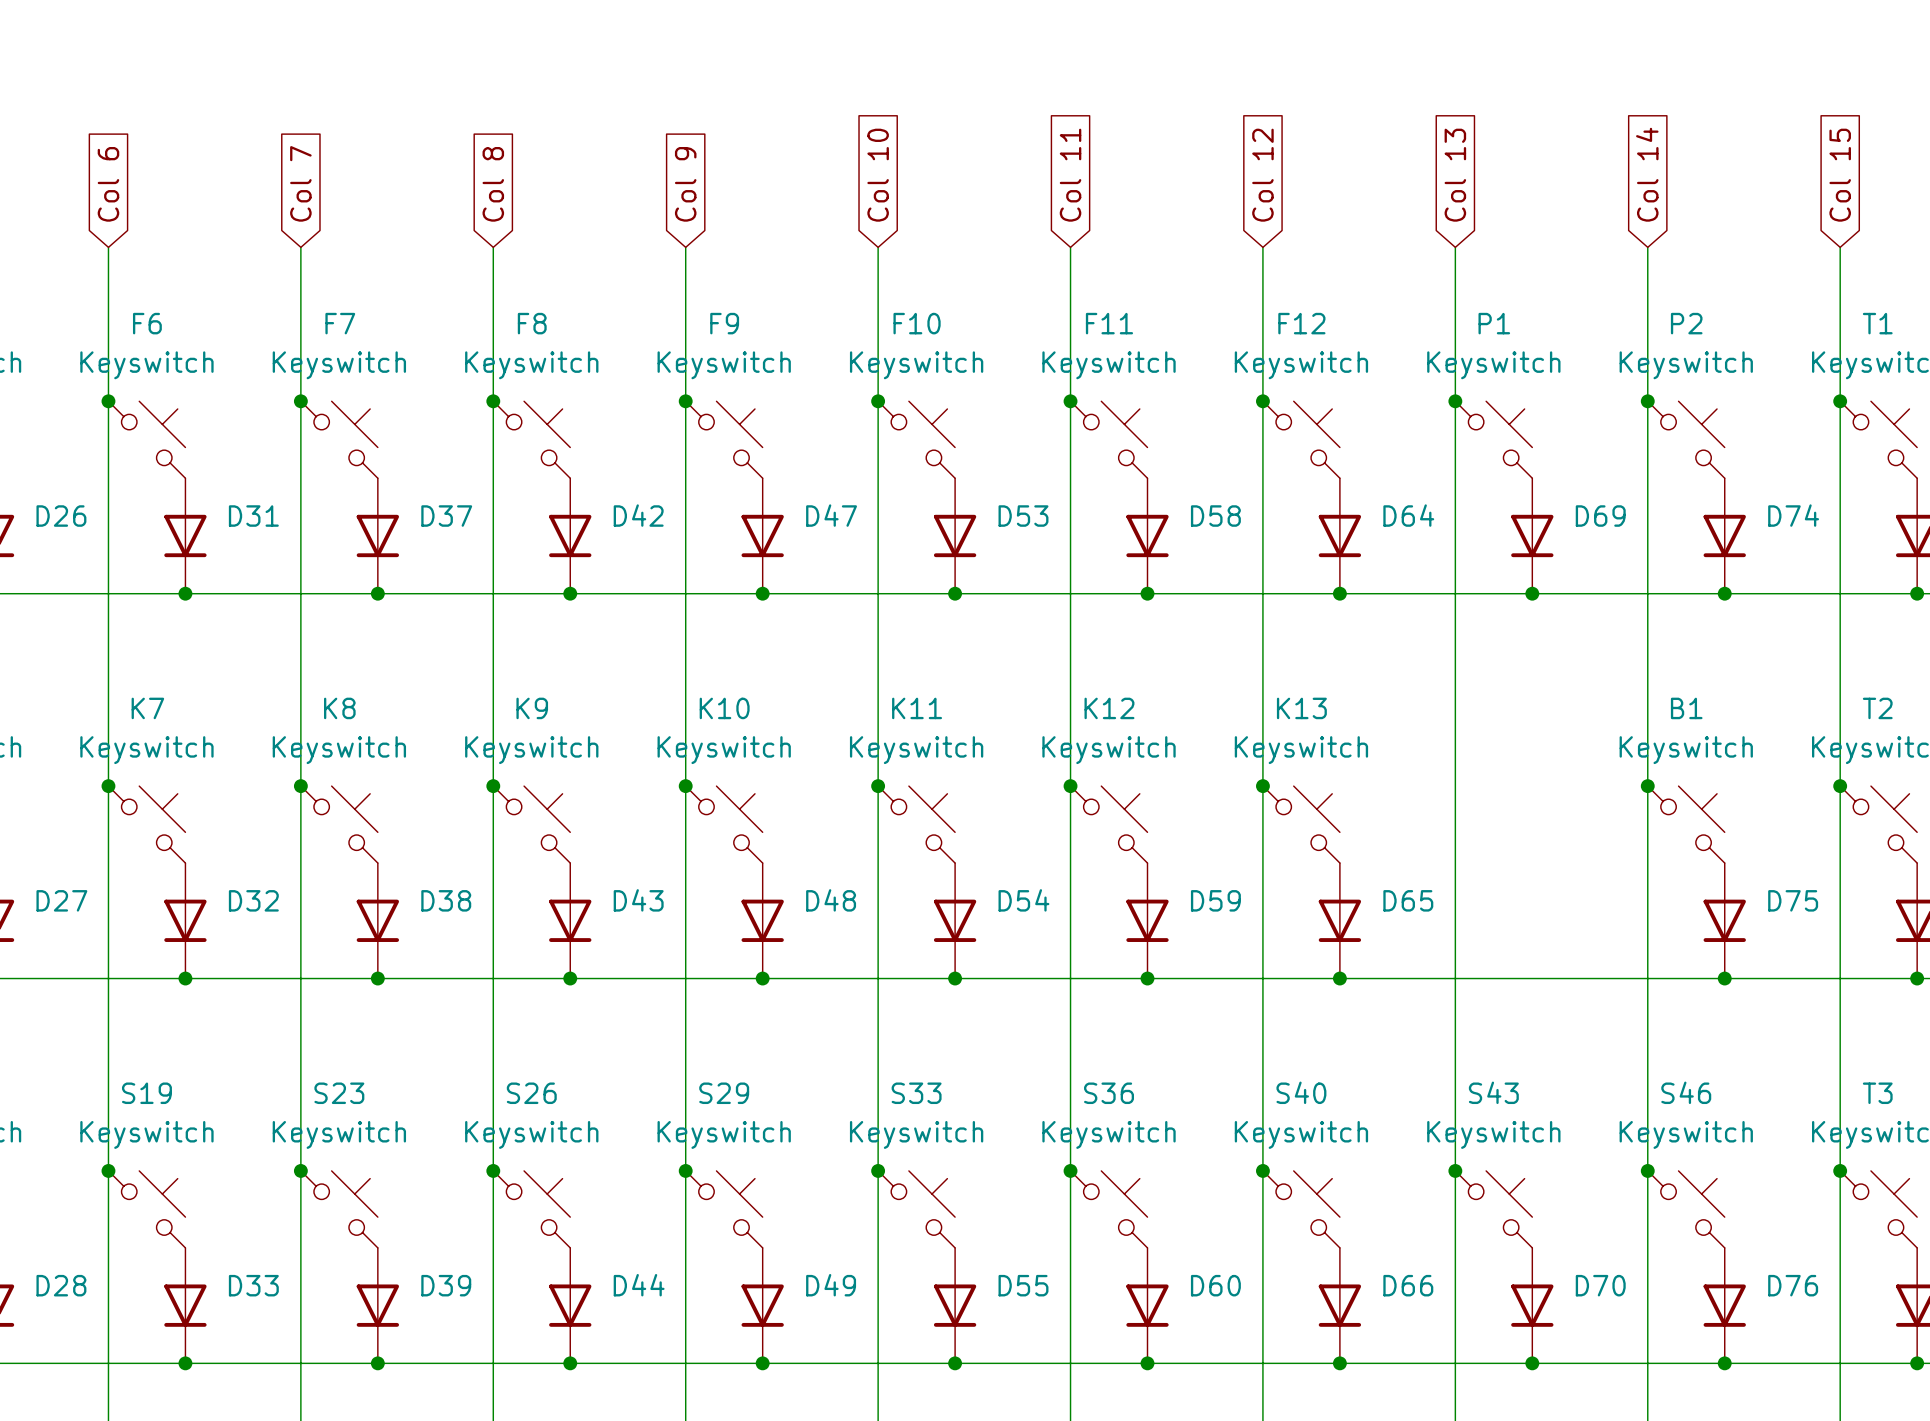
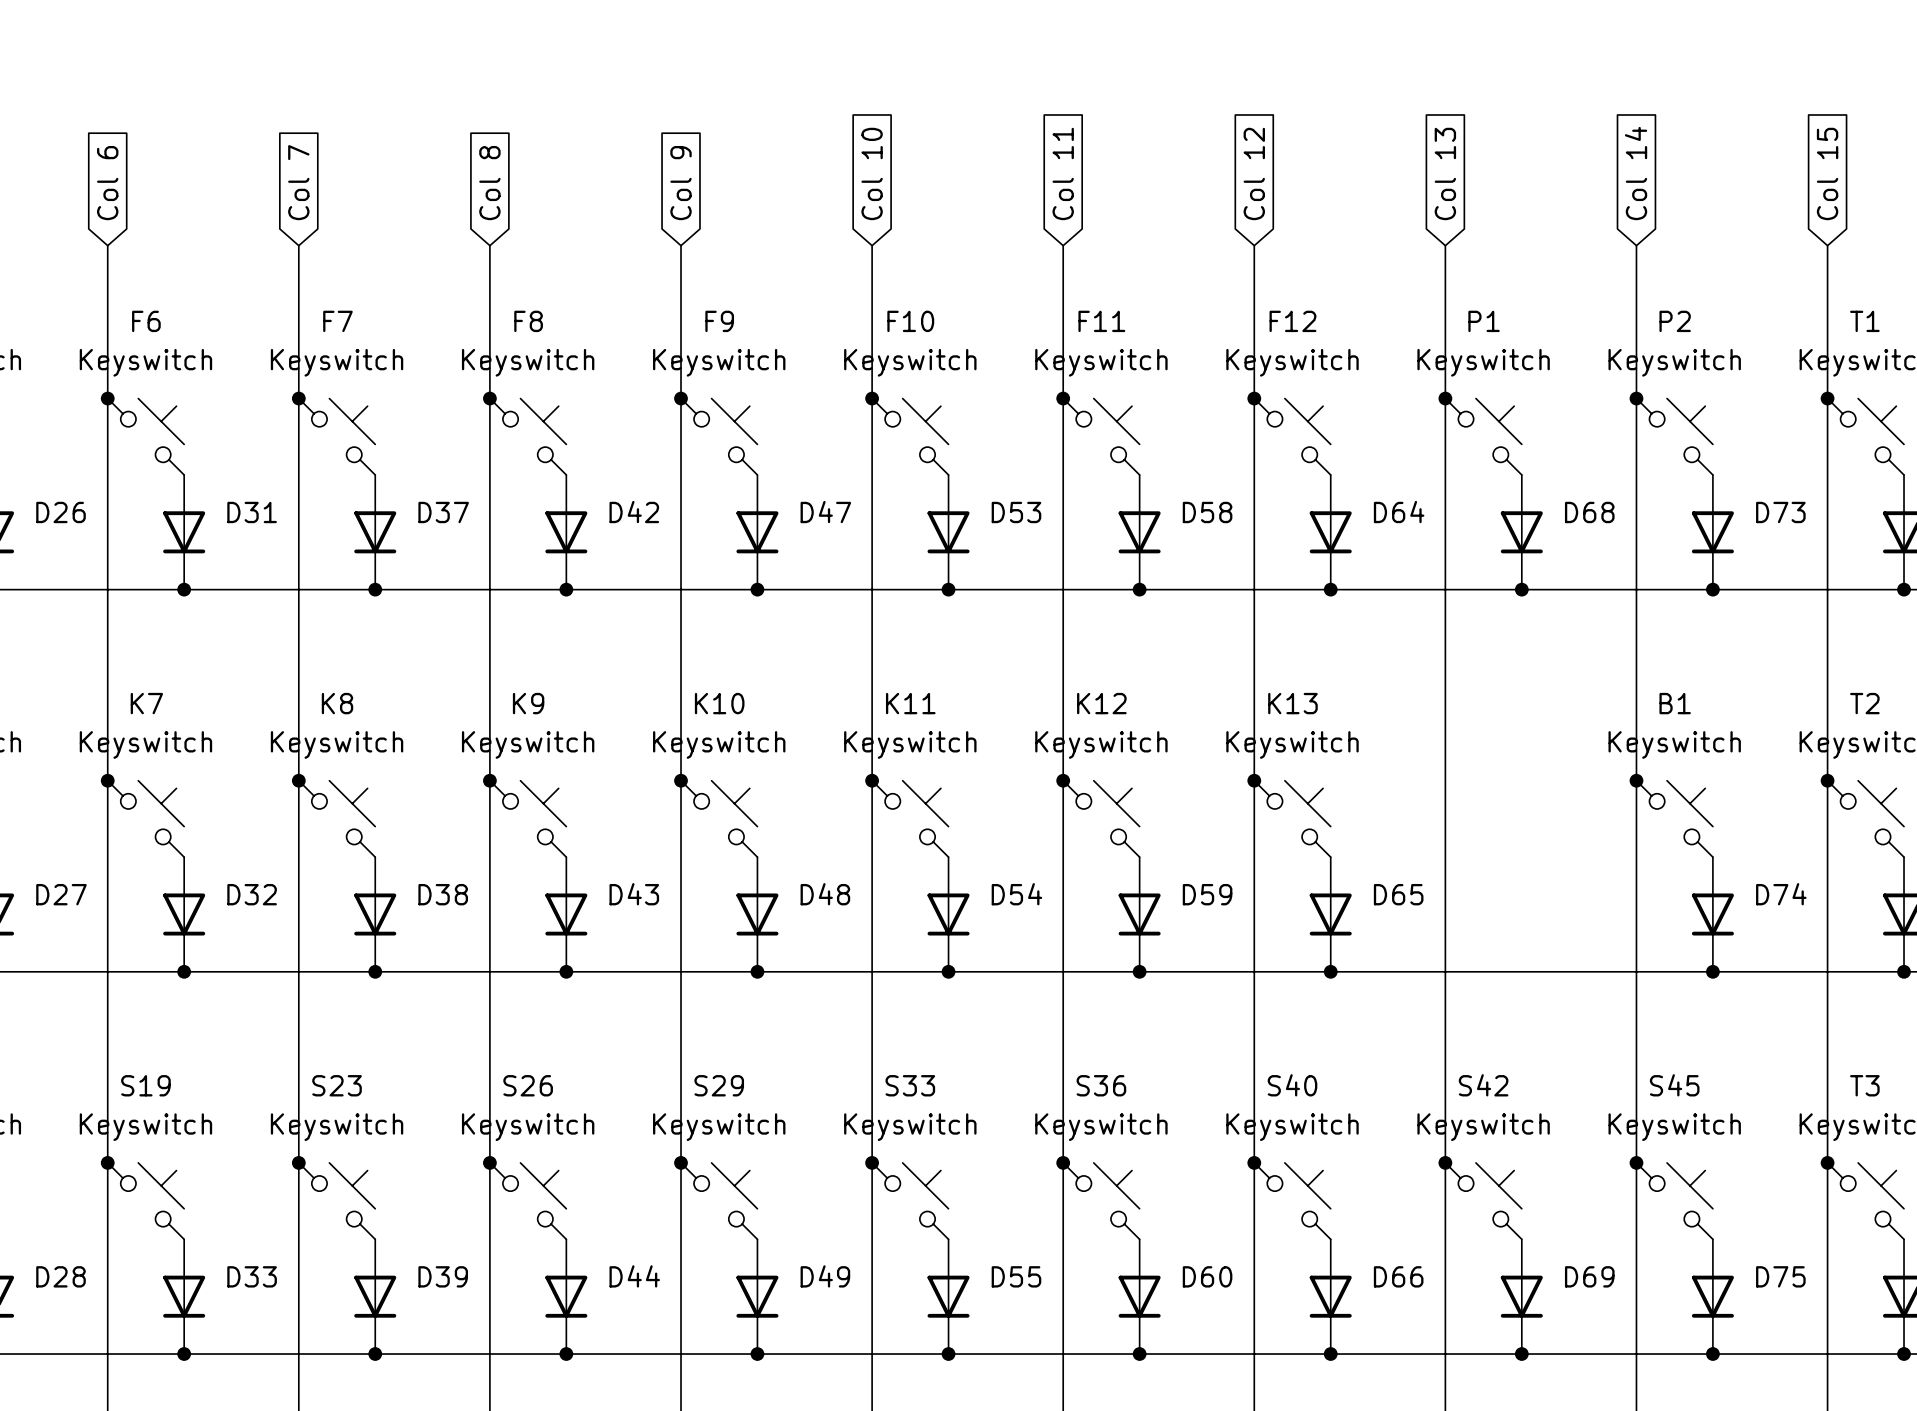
D74 name: D74 (1793, 515) -> D73 (1780, 512)
D69 name: D69 (1600, 516) -> D68 (1589, 512)
D75 name: D75 (1793, 900) -> D74 (1781, 894)
S43 name: S43 (1493, 1092) -> S42 (1483, 1085)
S46 name: S46 (1686, 1092) -> S45 (1674, 1085)
D70 name: D70 (1600, 1285) -> D69 (1589, 1276)
D76 name: D76 (1793, 1285) -> D75 (1780, 1276)

